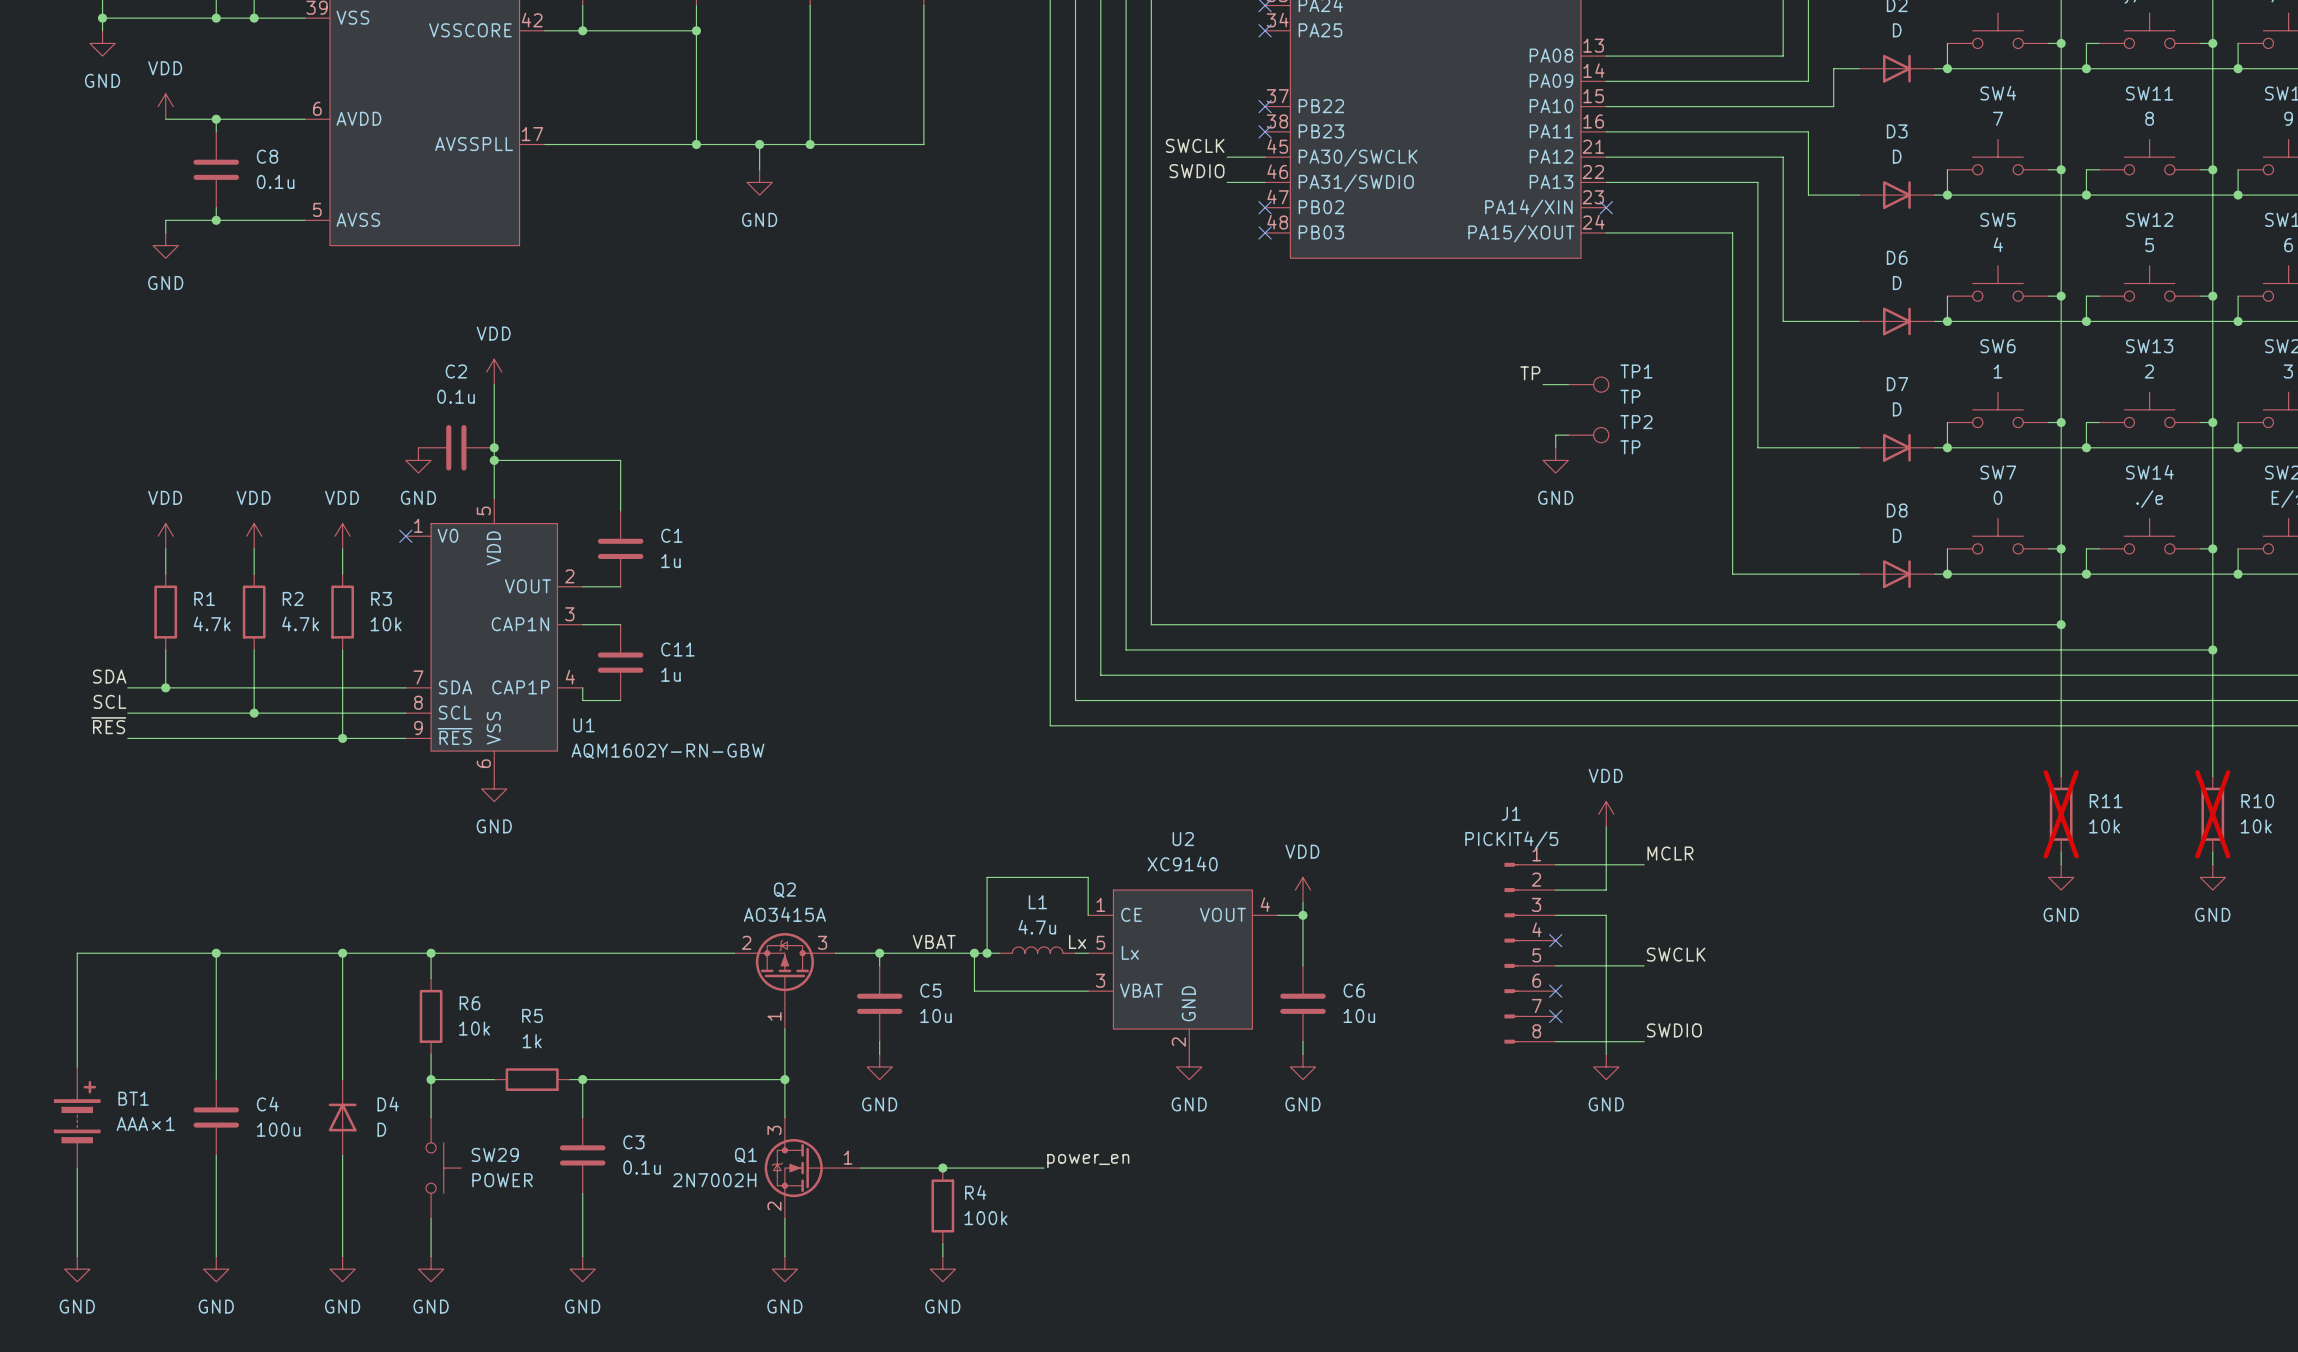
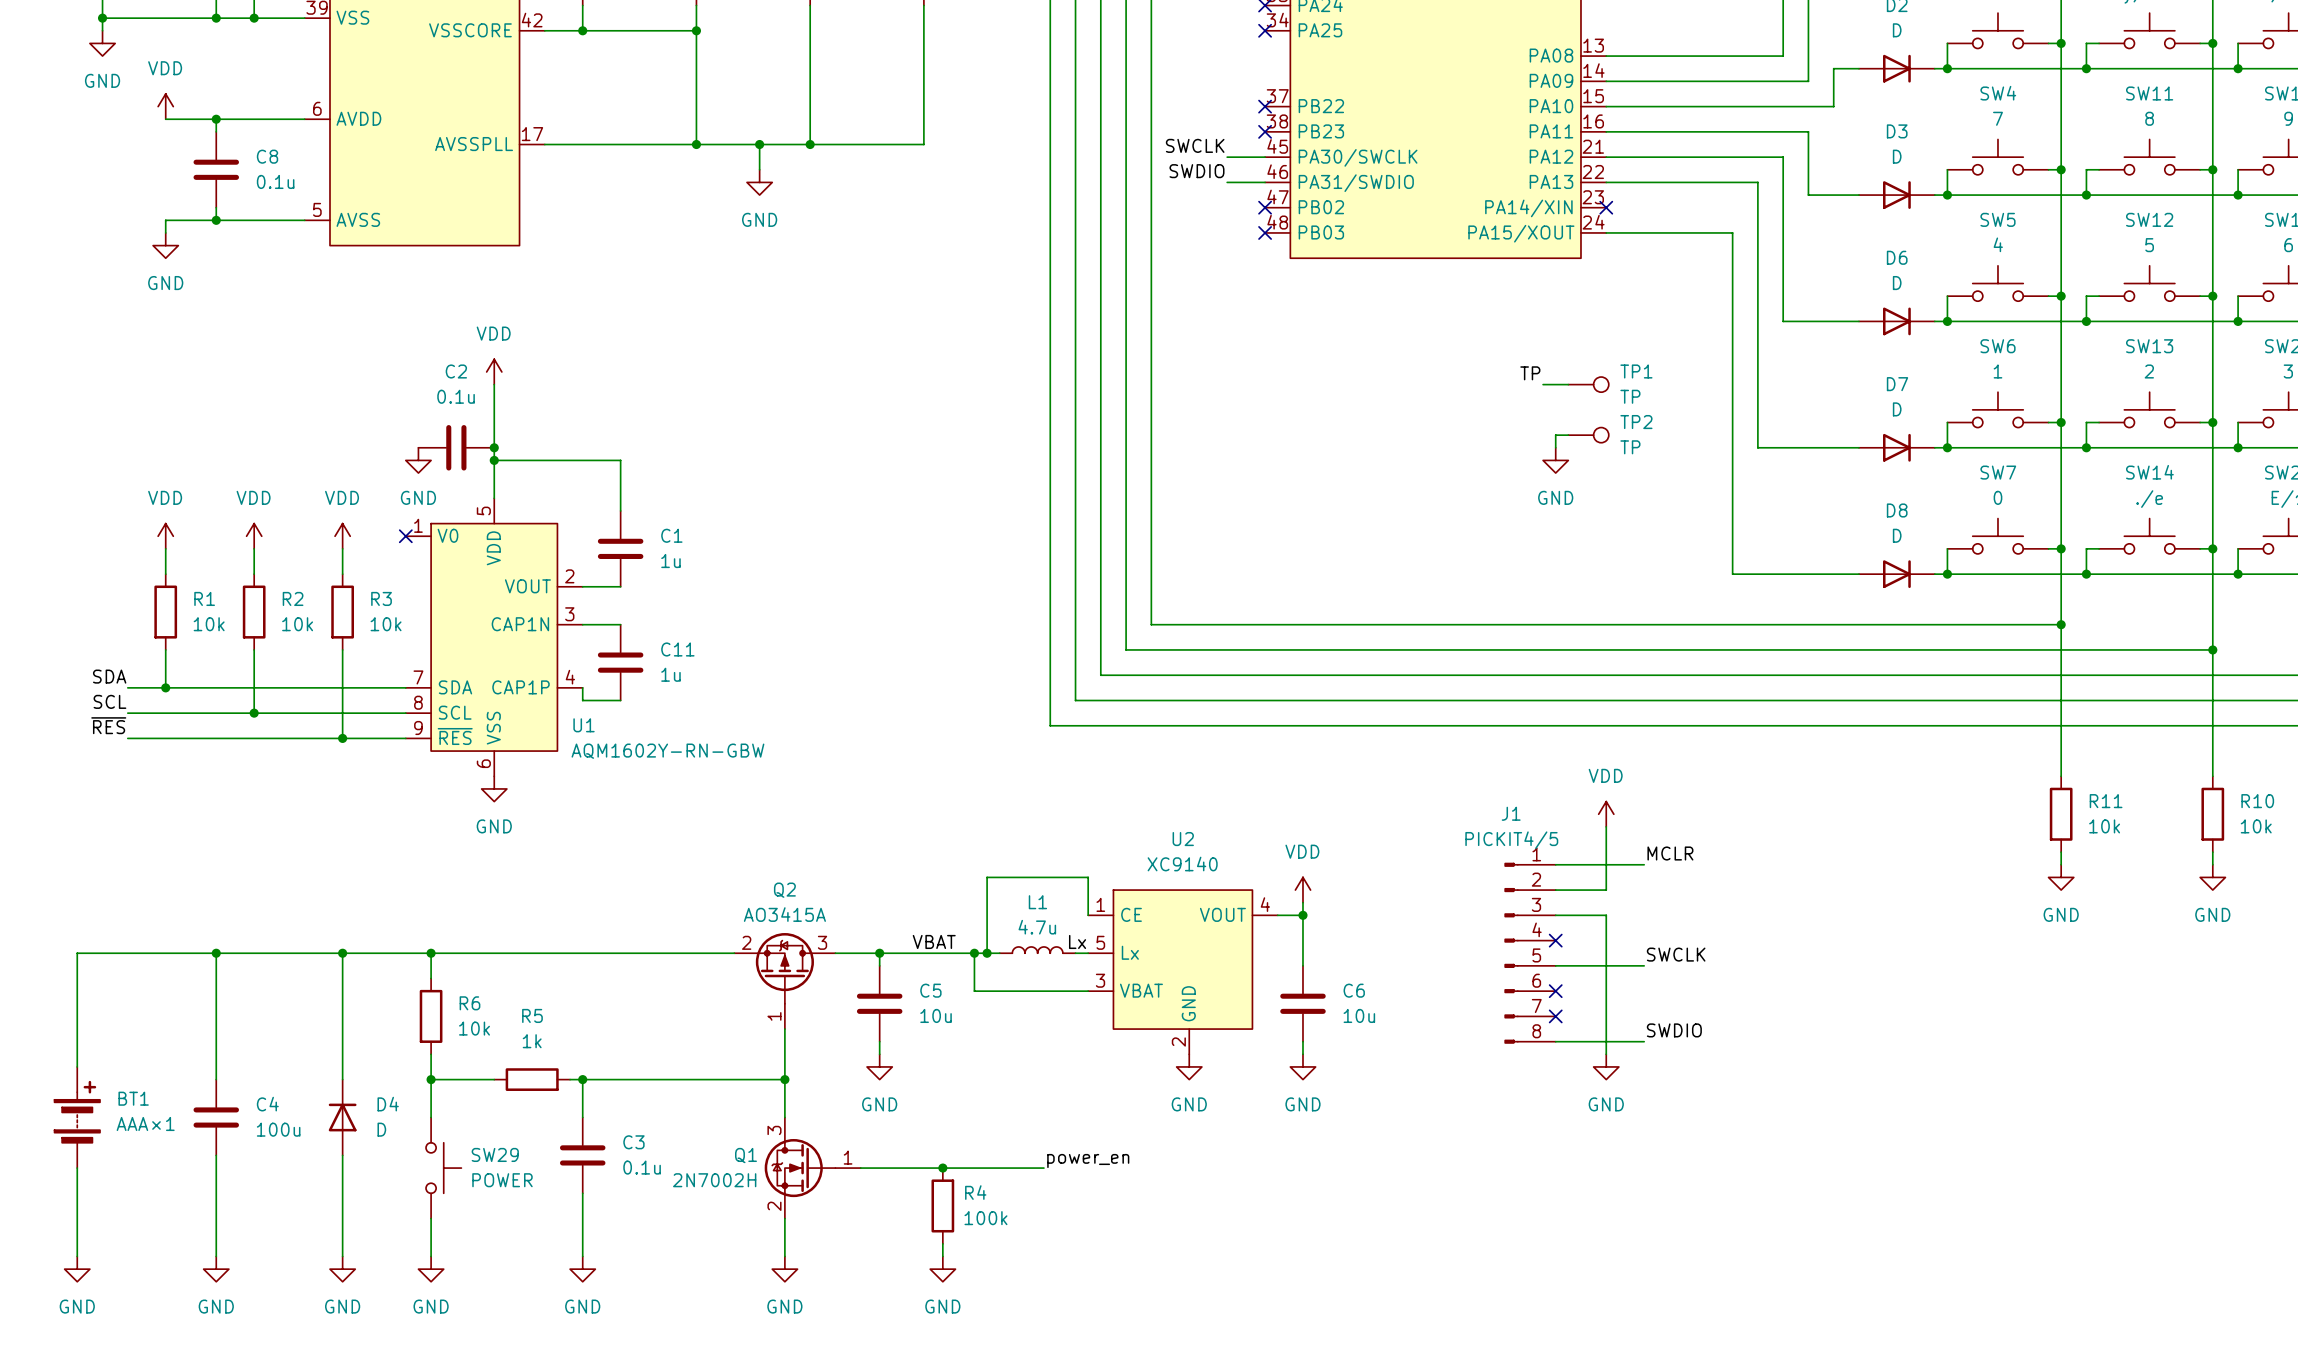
R1 value: 4.7k (212, 623) -> 10k (209, 624)
R2 value: 4.7k (300, 623) -> 10k (297, 624)
R11 do-not-place cross: (2061, 814) -> none
R10 do-not-place cross: (2212, 814) -> none

